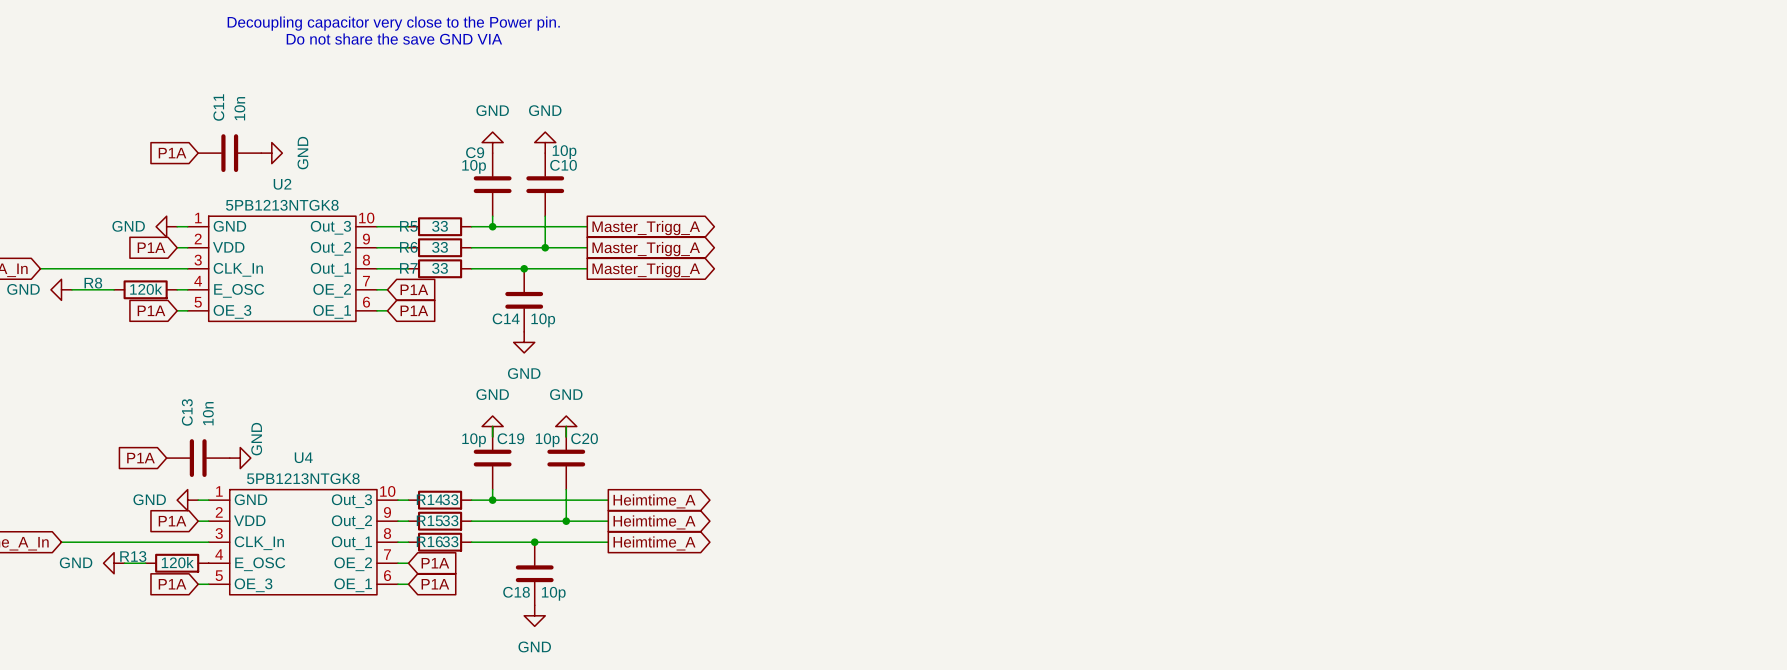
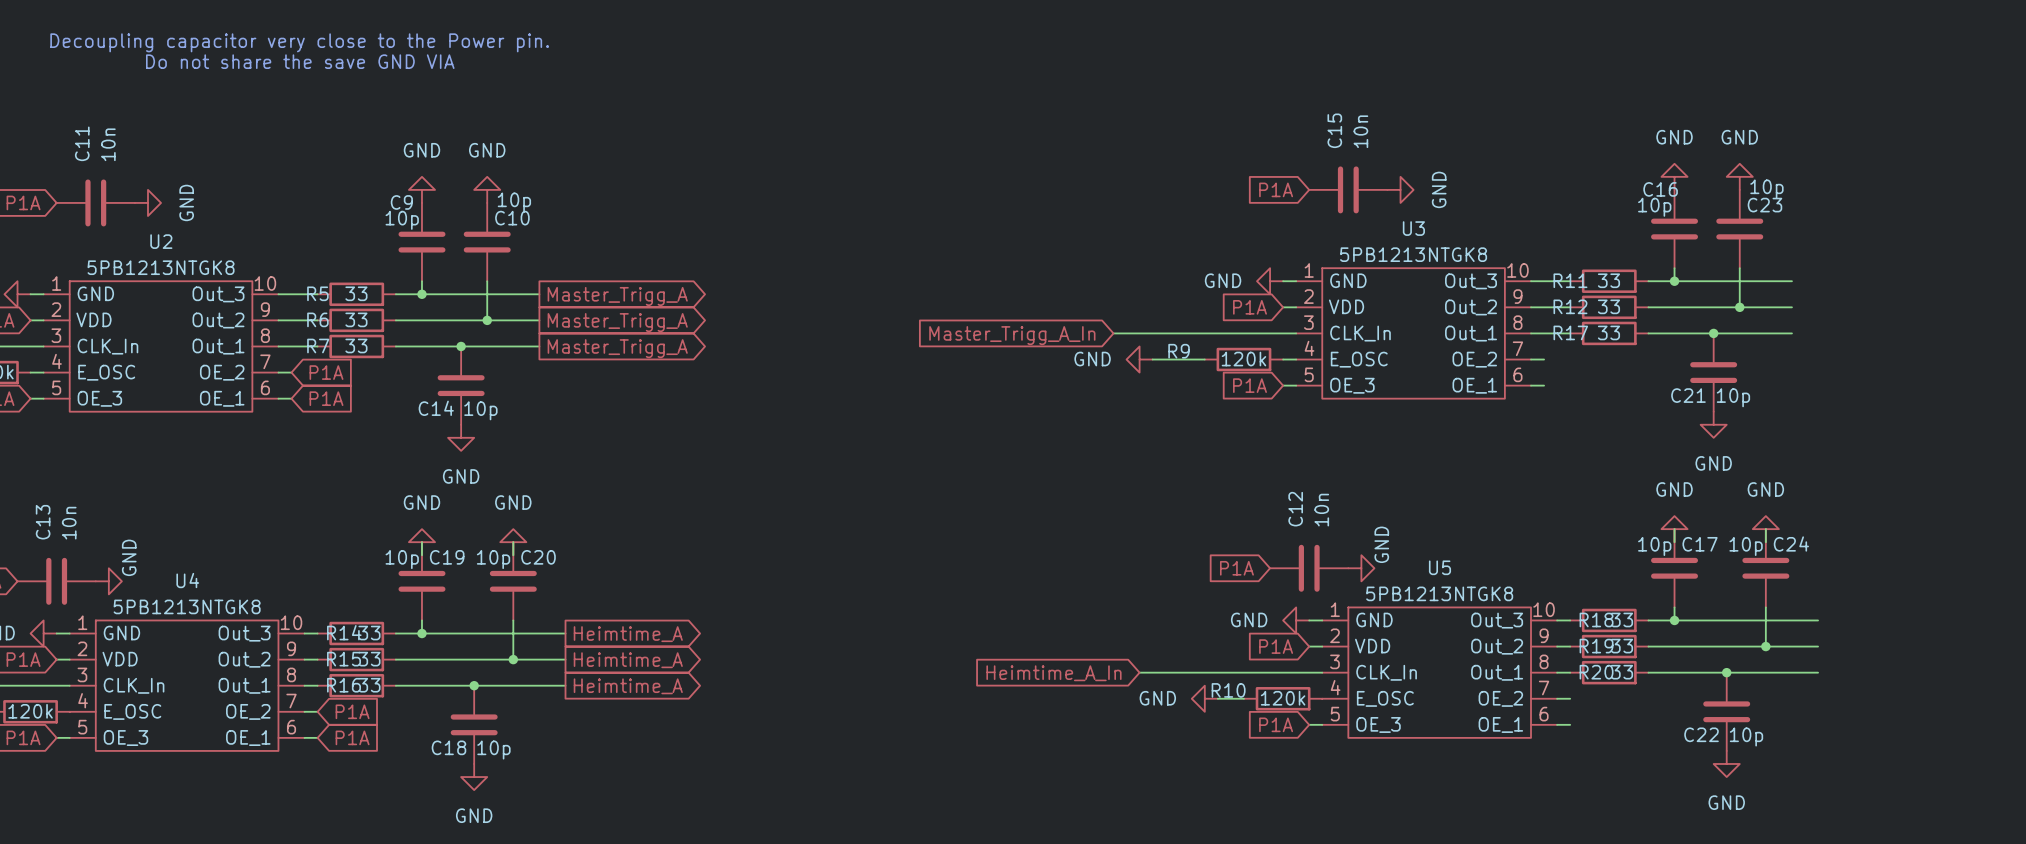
power symbol: none -> GND (1674, 176)
power symbol: none -> GND (1739, 176)
global label: none -> P1A (1276, 189)
C15: none -> 10n (1348, 189)
power symbol: none -> GND (1400, 189)
C16: none -> 10p (1674, 229)
C23: none -> 10p (1739, 229)
wire: none -> (1674, 268) (1674, 281)
wire: none -> (1739, 268) (1739, 307)
power symbol: none -> GND (1270, 281)
wire: none -> (1283, 281) (1296, 281)
wire: none -> (1531, 281) (1570, 281)
R11: none -> 33 (1609, 281)
wire: none -> (1648, 281) (1791, 281)
junction: none -> (1674, 281)
global label: none -> P1A (1250, 307)
wire: none -> (1283, 307) (1296, 307)
wire: none -> (1531, 307) (1570, 307)
R12: none -> 33 (1609, 307)
wire: none -> (1648, 307) (1791, 307)
junction: none -> (1739, 307)
wire: none -> (1113, 333) (1296, 333)
U3: none -> 5PB1213NTGK8 (1413, 333)
wire: none -> (1531, 333) (1570, 333)
R17: none -> 33 (1609, 333)
wire: none -> (1648, 333) (1791, 333)
junction: none -> (1713, 333)
global label: none -> Master_Trigg_A_In (1012, 335)
power symbol: none -> GND (1139, 359)
wire: none -> (1152, 359) (1204, 359)
R9: none -> 120k (1243, 359)
wire: none -> (1283, 359) (1296, 359)
wire: none -> (1531, 359) (1544, 359)
C21: none -> 10p (1713, 372)
global label: none -> P1A (1250, 385)
wire: none -> (1283, 385) (1296, 385)
wire: none -> (1531, 385) (1544, 385)
power symbol: none -> GND (1713, 424)
wire: none -> (1674, 529) (1674, 542)
power symbol: none -> GND (1674, 529)
wire: none -> (1765, 529) (1765, 542)
power symbol: none -> GND (1765, 529)
global label: none -> P1A (1236, 568)
C12: none -> 10n (1309, 568)
power symbol: none -> GND (1361, 568)
C17: none -> 10p (1674, 568)
C24: none -> 10p (1765, 568)
wire: none -> (1674, 607) (1674, 620)
wire: none -> (1765, 607) (1765, 646)
power symbol: none -> GND (1296, 620)
wire: none -> (1309, 620) (1322, 620)
wire: none -> (1557, 620) (1570, 620)
R18: none -> 33 (1609, 620)
wire: none -> (1648, 620) (1818, 620)
junction: none -> (1674, 620)
global label: none -> P1A (1276, 646)
wire: none -> (1309, 646) (1322, 646)
wire: none -> (1557, 646) (1570, 646)
R19: none -> 33 (1609, 646)
wire: none -> (1648, 646) (1818, 646)
junction: none -> (1765, 646)
wire: none -> (1139, 672) (1322, 672)
U5: none -> 5PB1213NTGK8 (1439, 672)
wire: none -> (1557, 672) (1570, 672)
R20: none -> 33 (1609, 672)
wire: none -> (1648, 672) (1818, 672)
junction: none -> (1726, 672)
global label: none -> Heimtime_A_In (1053, 673)
power symbol: none -> GND (1204, 698)
wire: none -> (1217, 698) (1243, 698)
R10: none -> 120k (1283, 698)
wire: none -> (1557, 698) (1570, 698)
C22: none -> 10p (1726, 711)
global label: none -> P1A (1276, 724)
wire: none -> (1309, 724) (1322, 724)
wire: none -> (1557, 724) (1570, 724)
power symbol: none -> GND (1726, 763)

